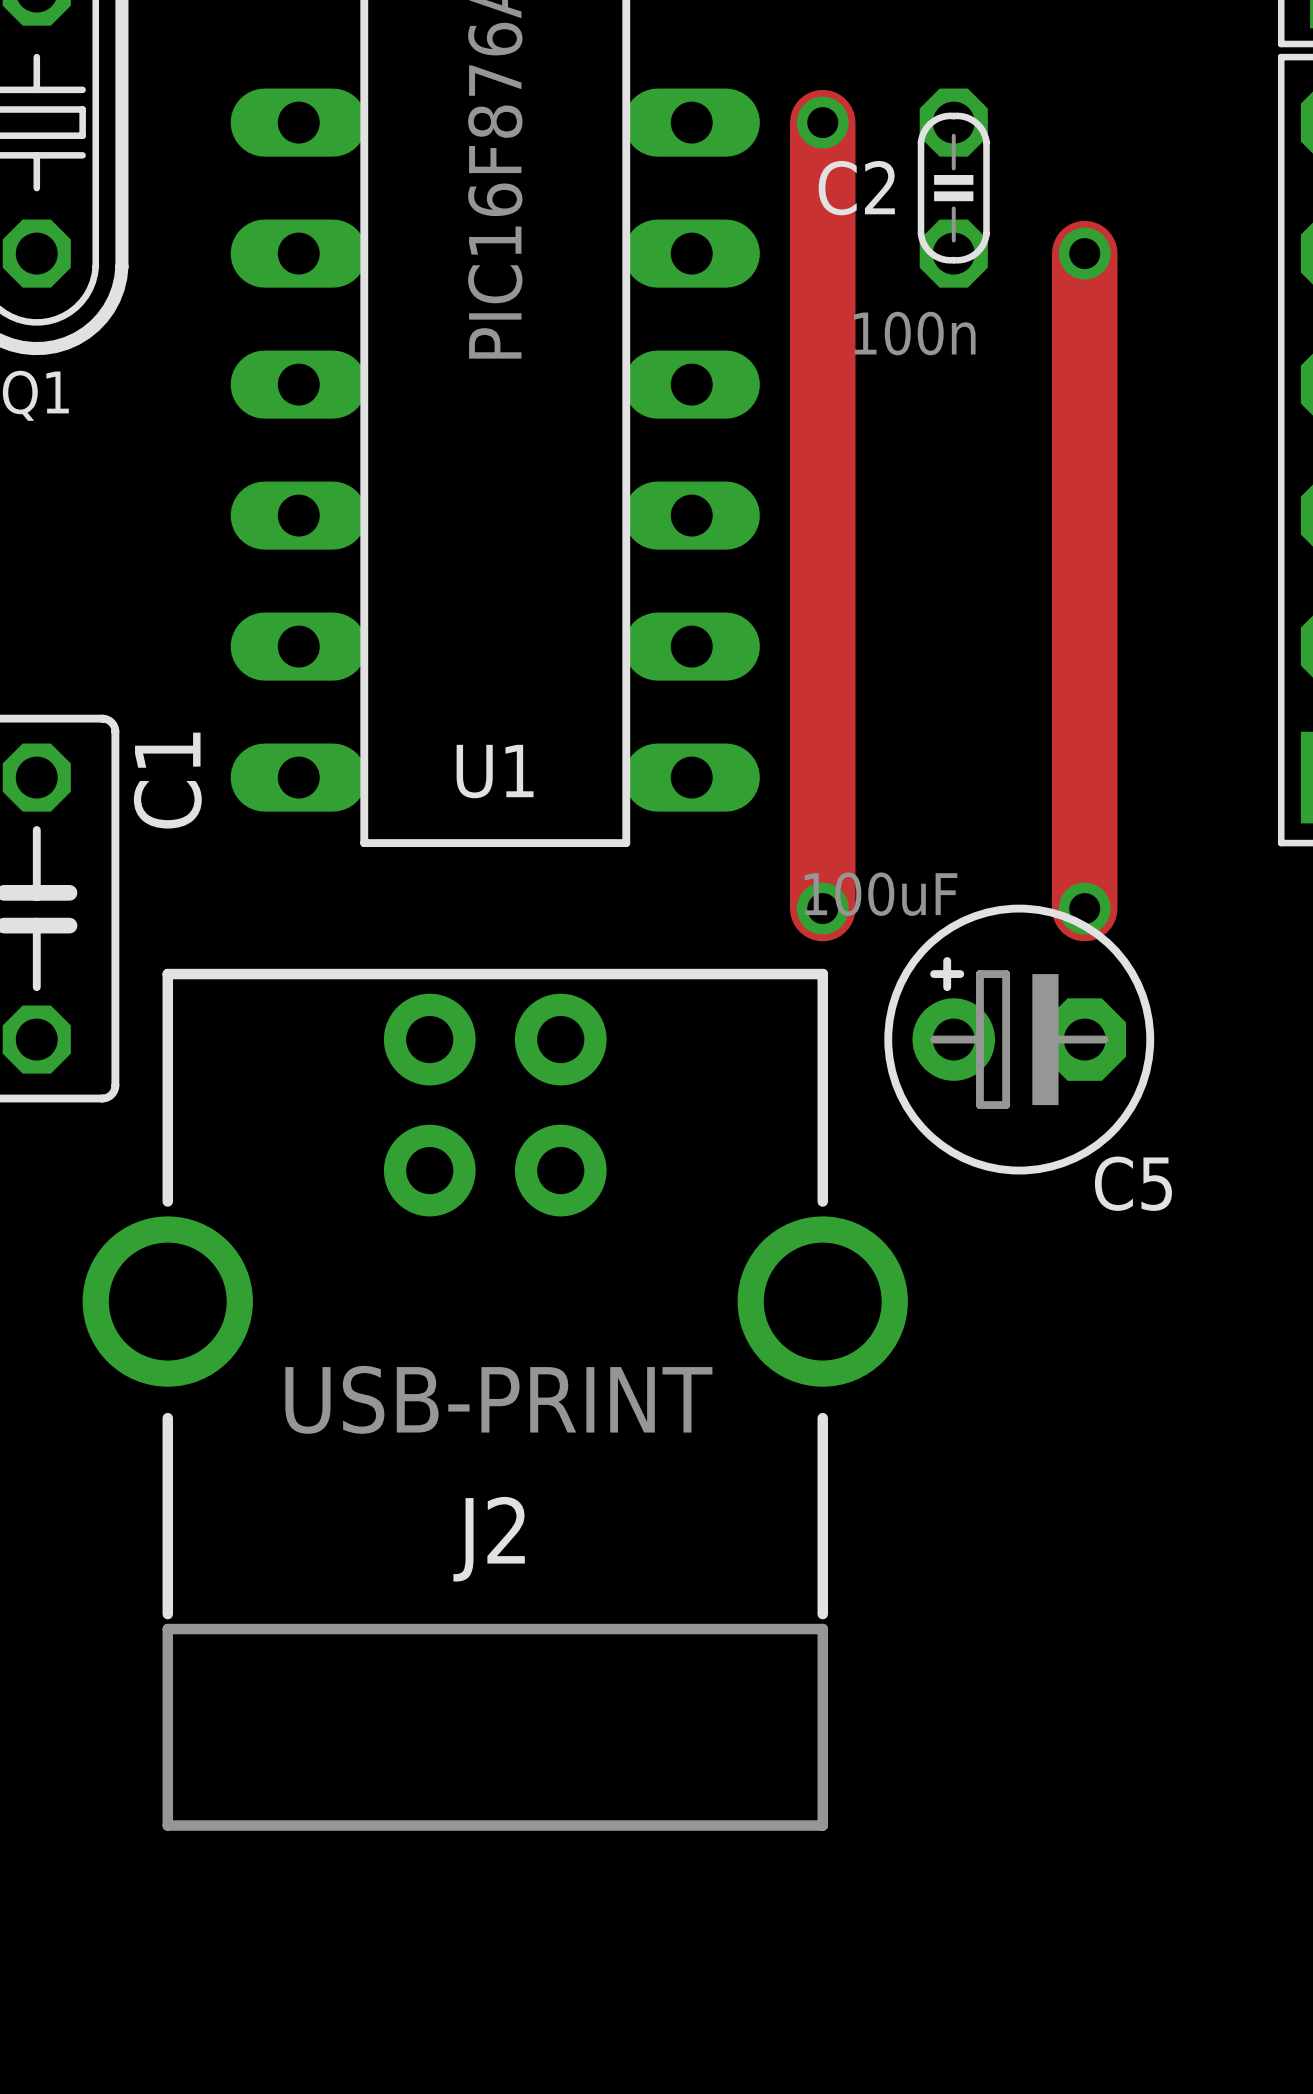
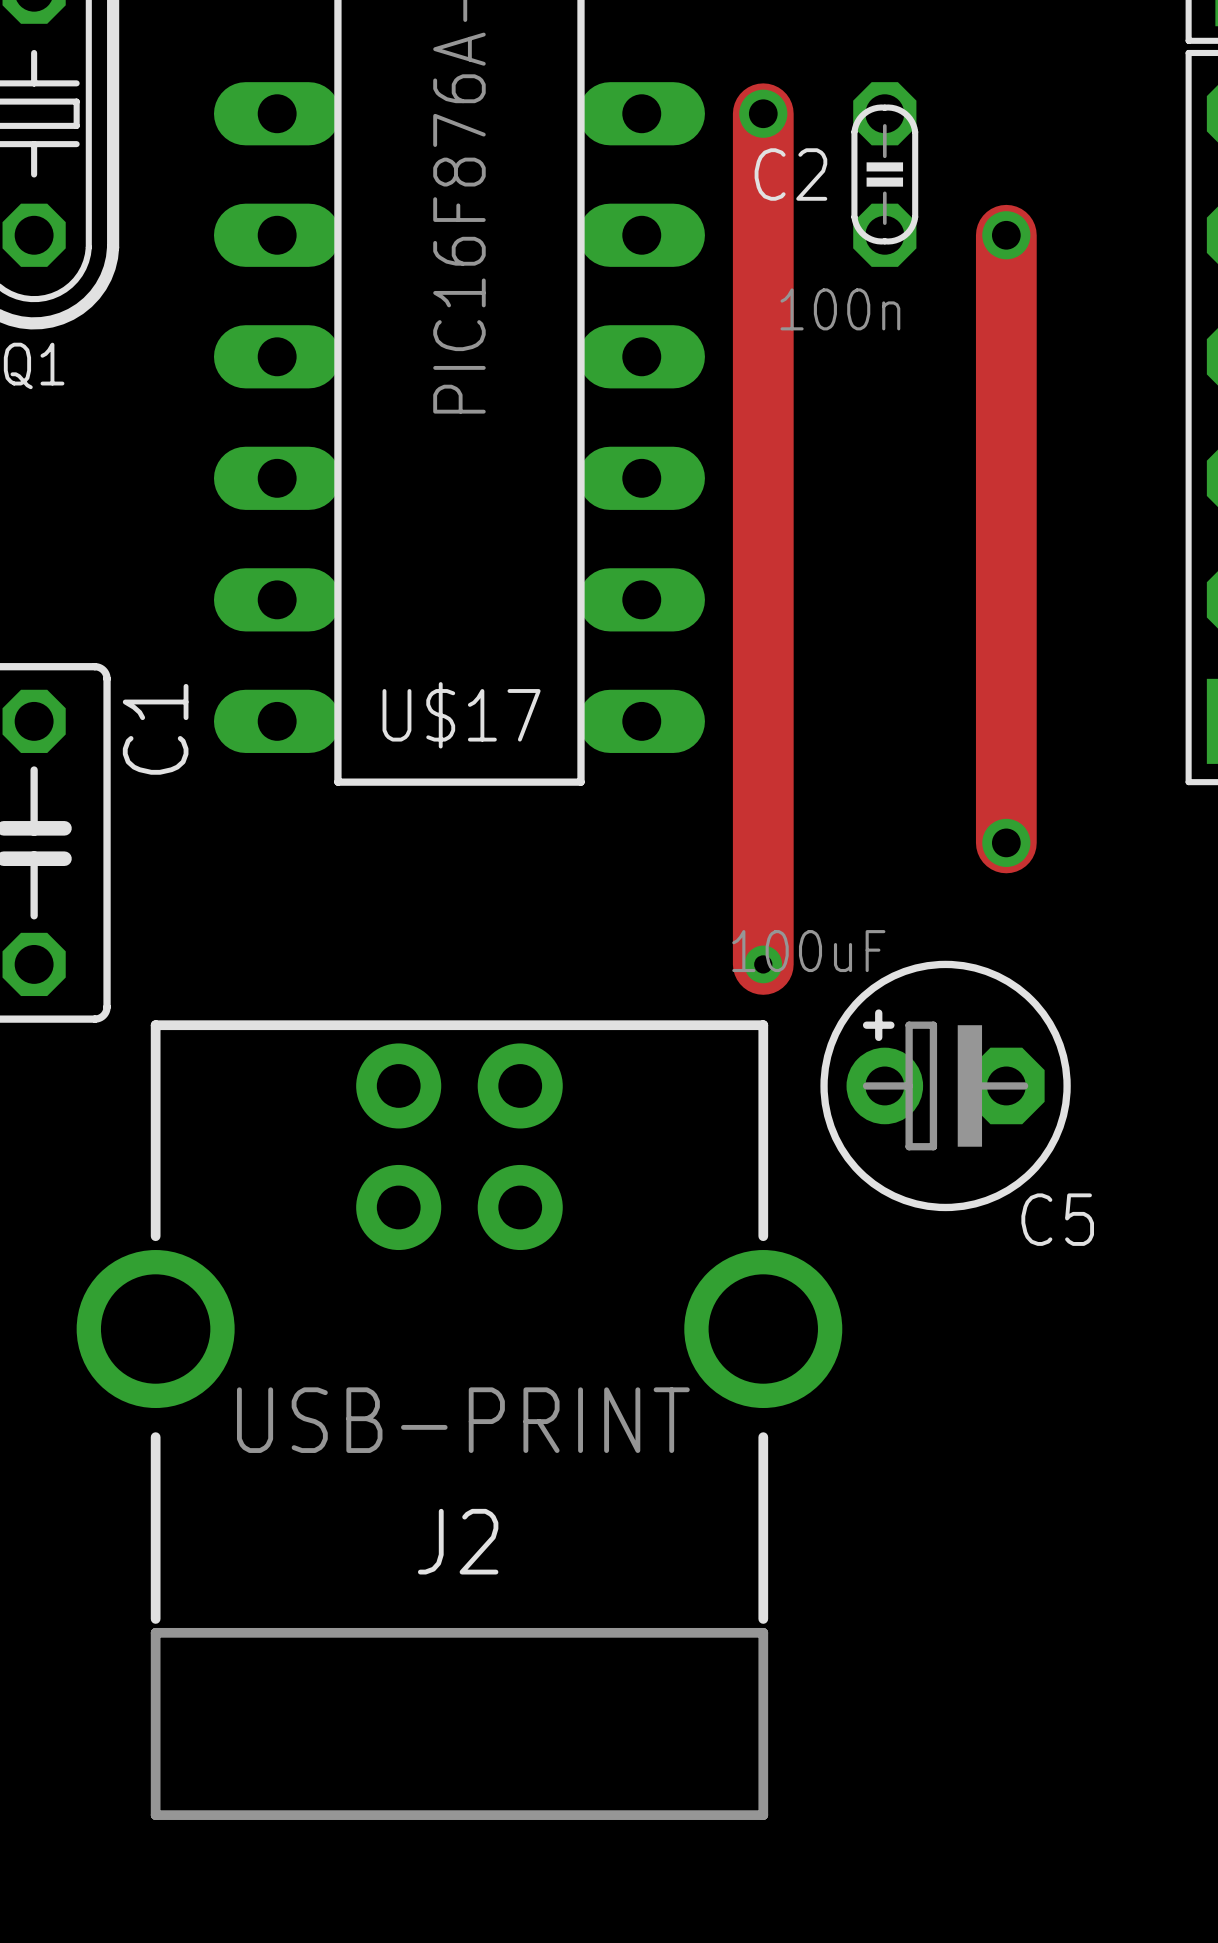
U1 name: U1 (495, 771) -> U$17 (461, 715)
track: none -> (763, 842) (763, 964)
via: (822, 908) -> none
via: none -> (763, 964)
C5 position: (1019, 1039) -> (945, 1085)
J2 position: (495, 1399) -> (459, 1420)

